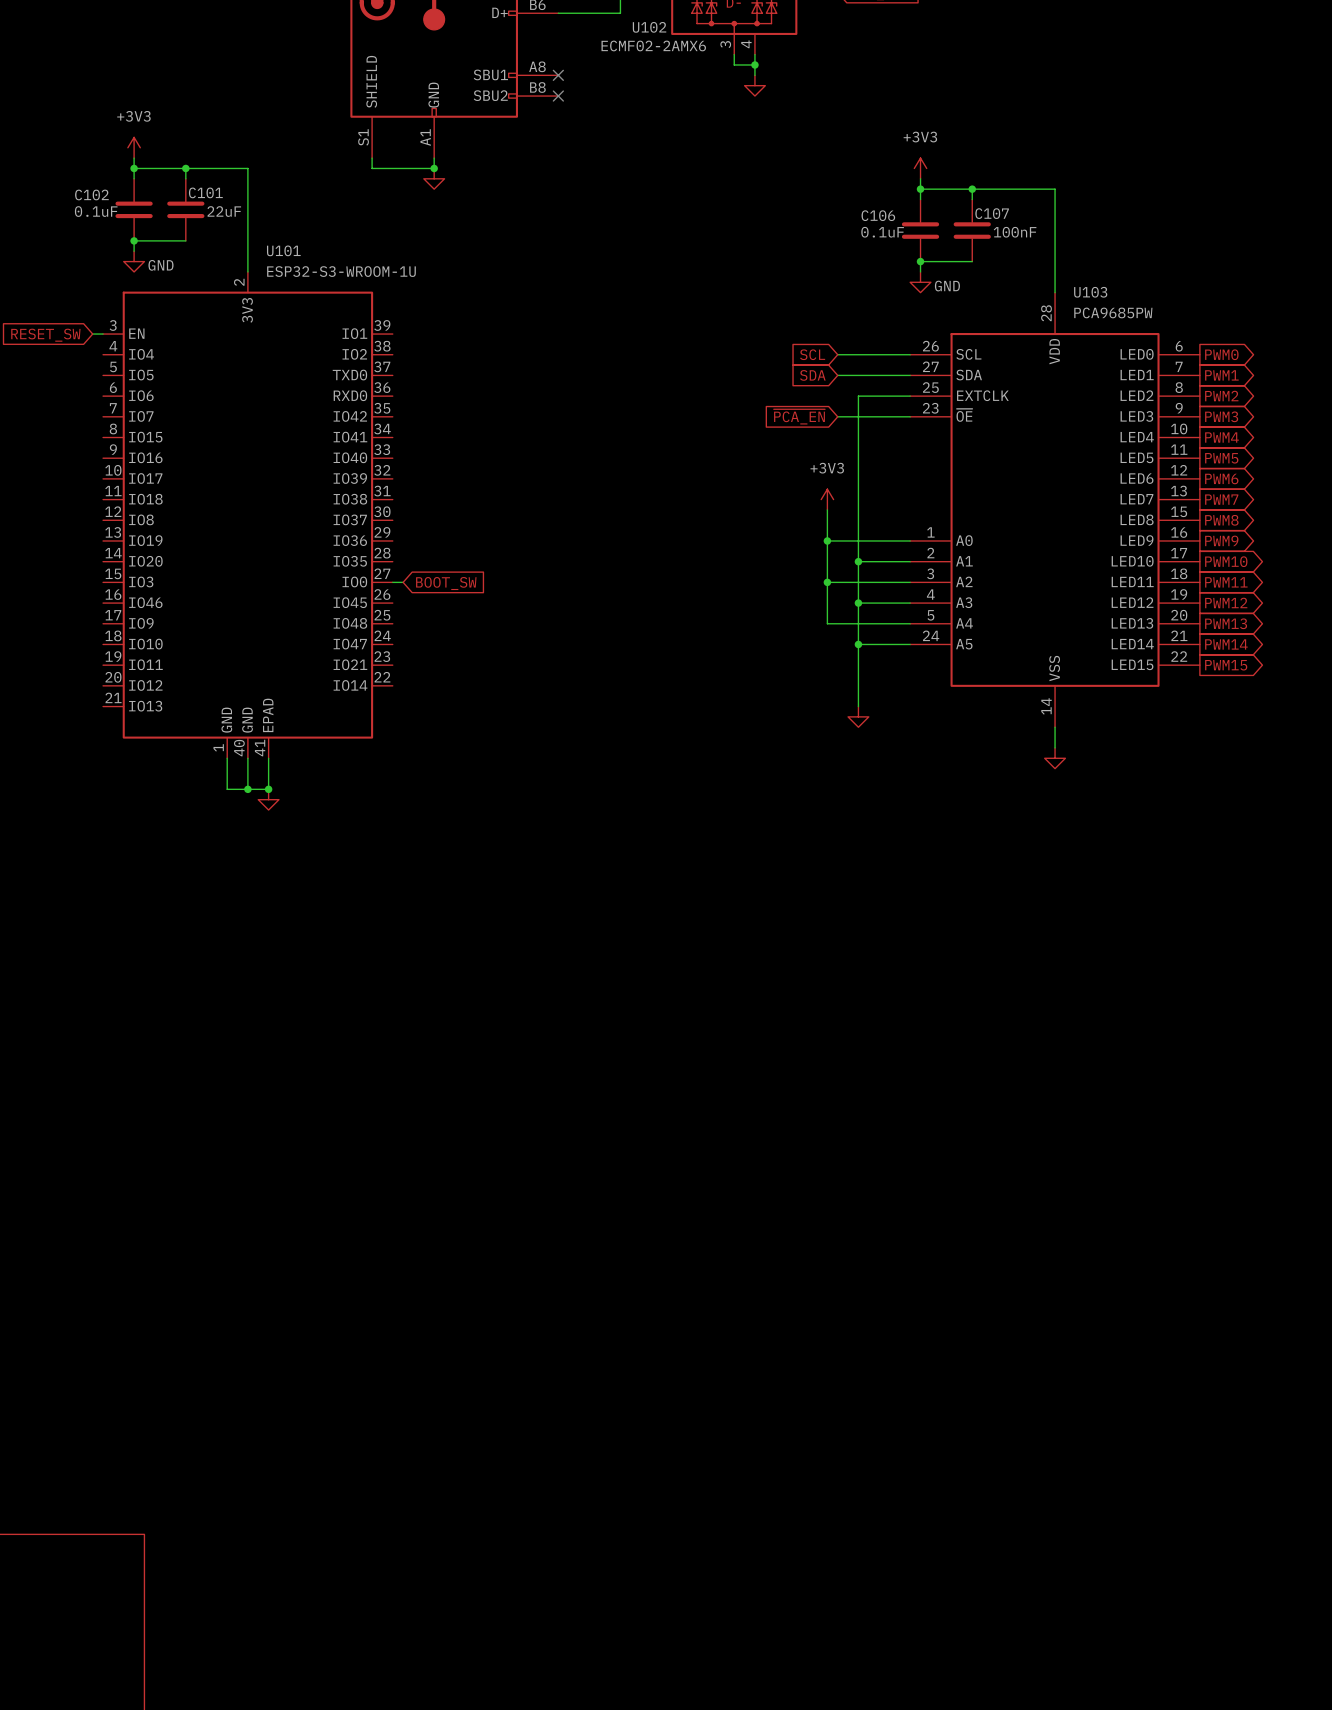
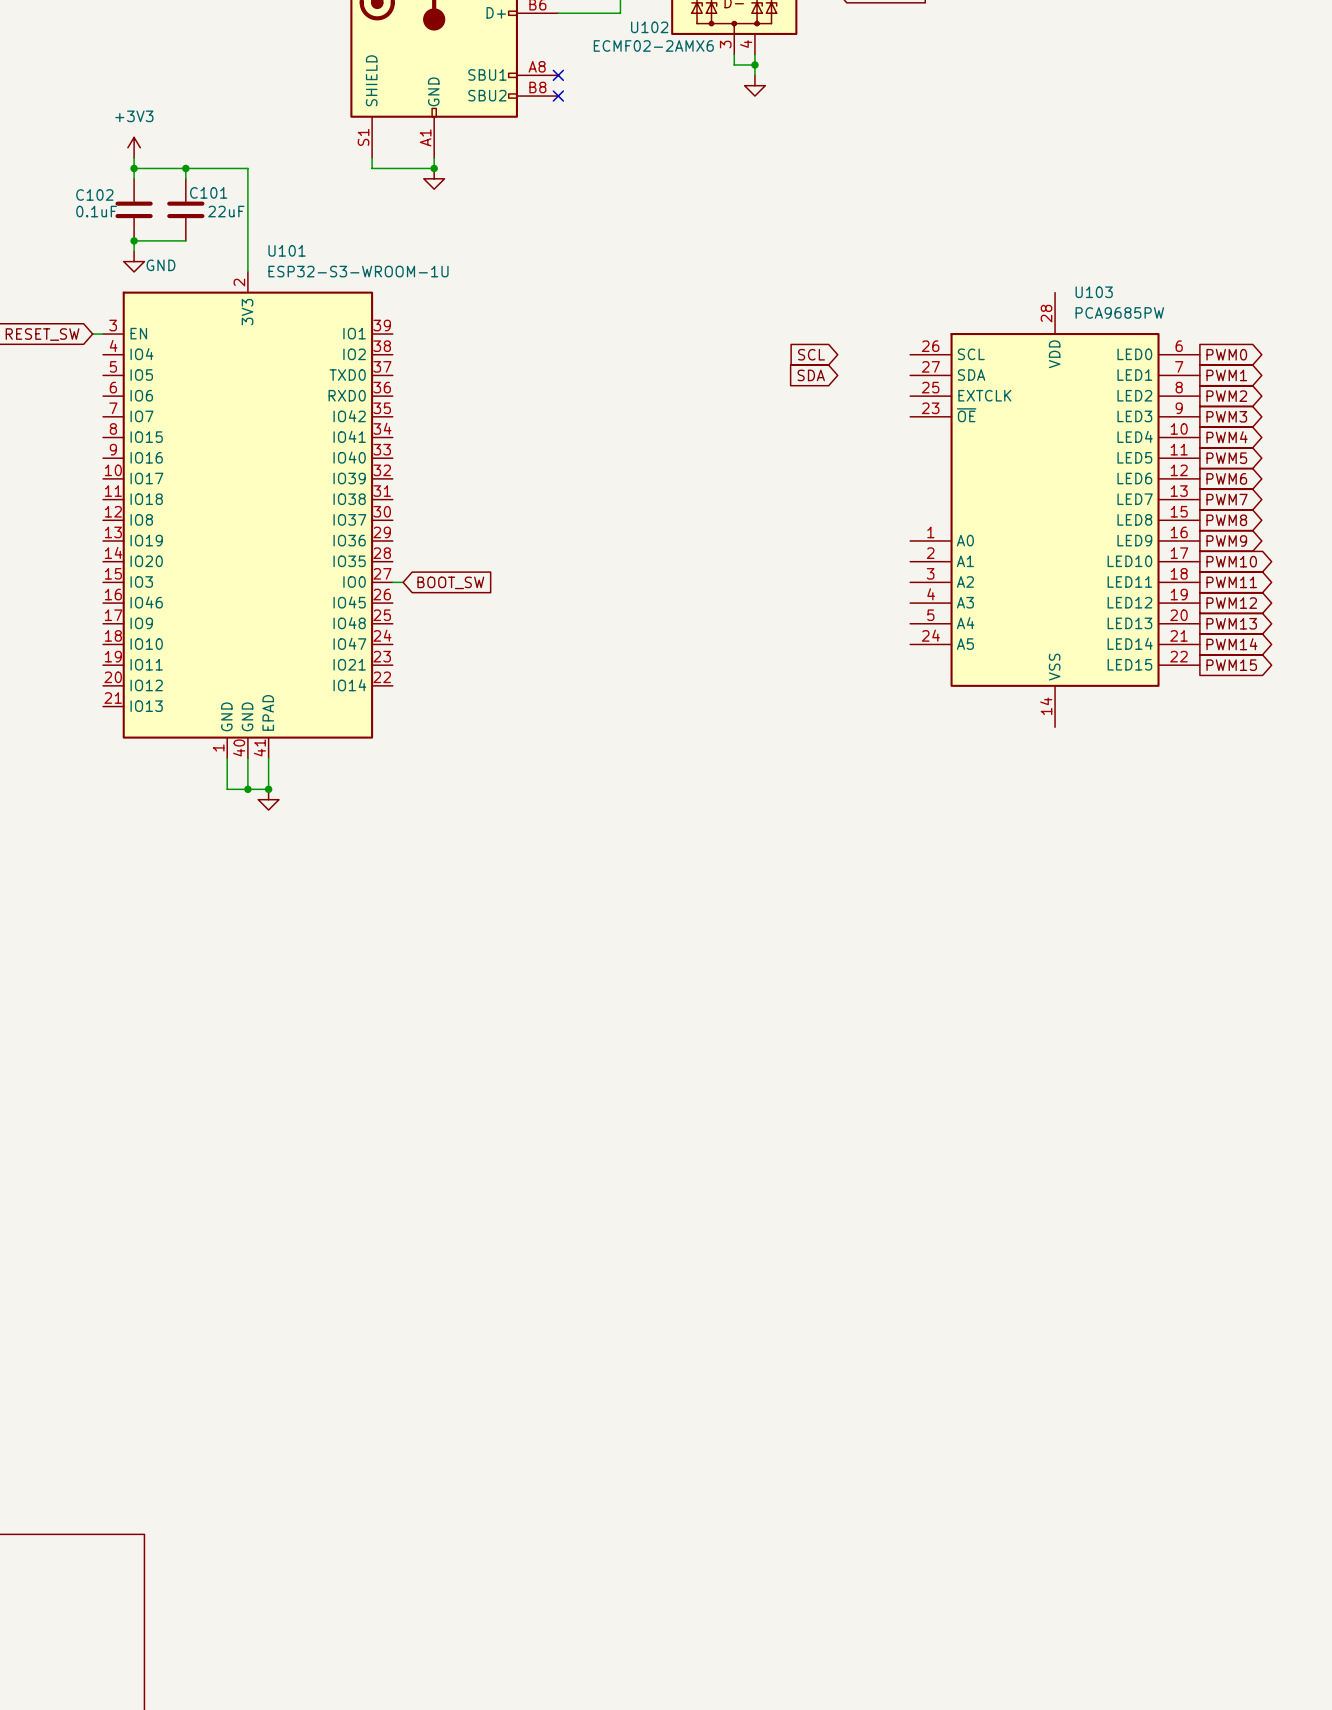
power symbol: +3V3 (920, 168) -> none
wire: (920, 178) (920, 199) -> none
wire: (920, 189) (1055, 189) (1055, 292) -> none
junction: (920, 189) -> none
wire: (972, 189) (972, 199) -> none
junction: (972, 189) -> none
C106: 0.1uF (920, 230) -> none
C107: 100nF (972, 230) -> none
junction: (920, 261) -> none
wire: (972, 261) (920, 261) (920, 271) -> none
power symbol: GND (920, 282) -> none
wire: (837, 354) (910, 354) -> none
wire: (837, 375) (910, 375) -> none
wire: (910, 396) (858, 396) (858, 706) -> none
global label: ~{PCA_EN} (799, 416) -> none
wire: (837, 416) (910, 416) -> none
power symbol: +3V3 (827, 499) -> none
wire: (827, 509) (827, 623) (910, 623) -> none
wire: (827, 540) (910, 540) -> none
junction: (827, 540) -> none
wire: (858, 561) (910, 561) -> none
junction: (858, 561) -> none
wire: (827, 582) (910, 582) -> none
junction: (827, 582) -> none
wire: (858, 603) (910, 603) -> none
junction: (858, 603) -> none
wire: (858, 644) (910, 644) -> none
junction: (858, 644) -> none
power symbol: (858, 716) -> none
wire: (1055, 727) (1055, 747) -> none
power symbol: (1055, 758) -> none

